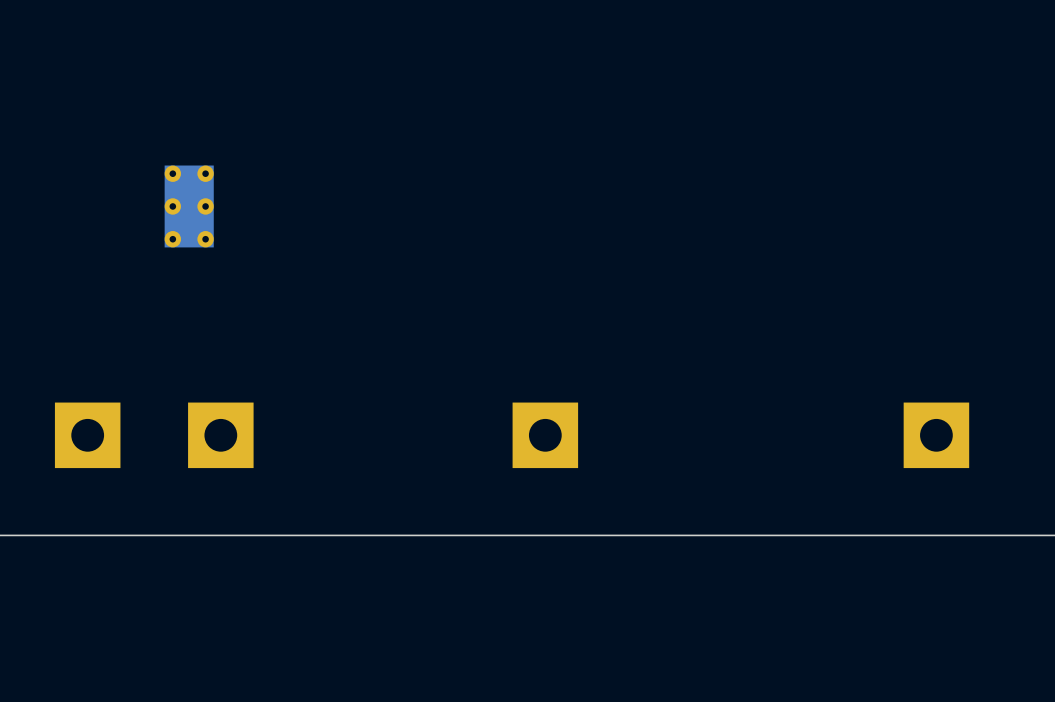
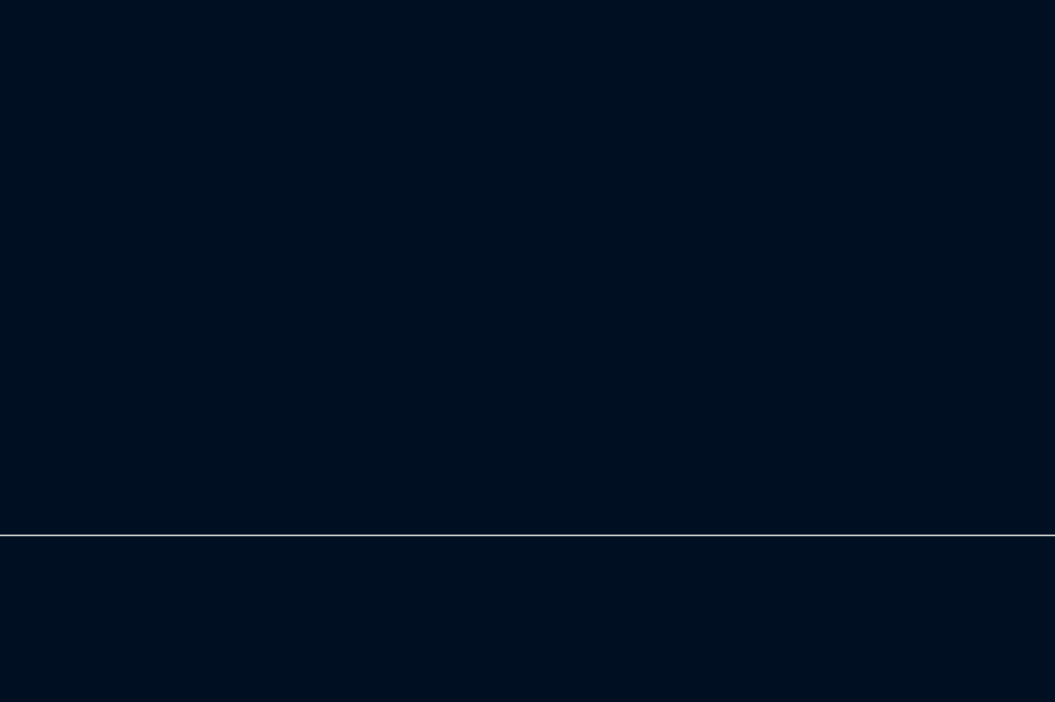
part: (189, 206) -> none
part: (87, 435) -> none
part: (220, 435) -> none
part: (545, 435) -> none
part: (936, 435) -> none

